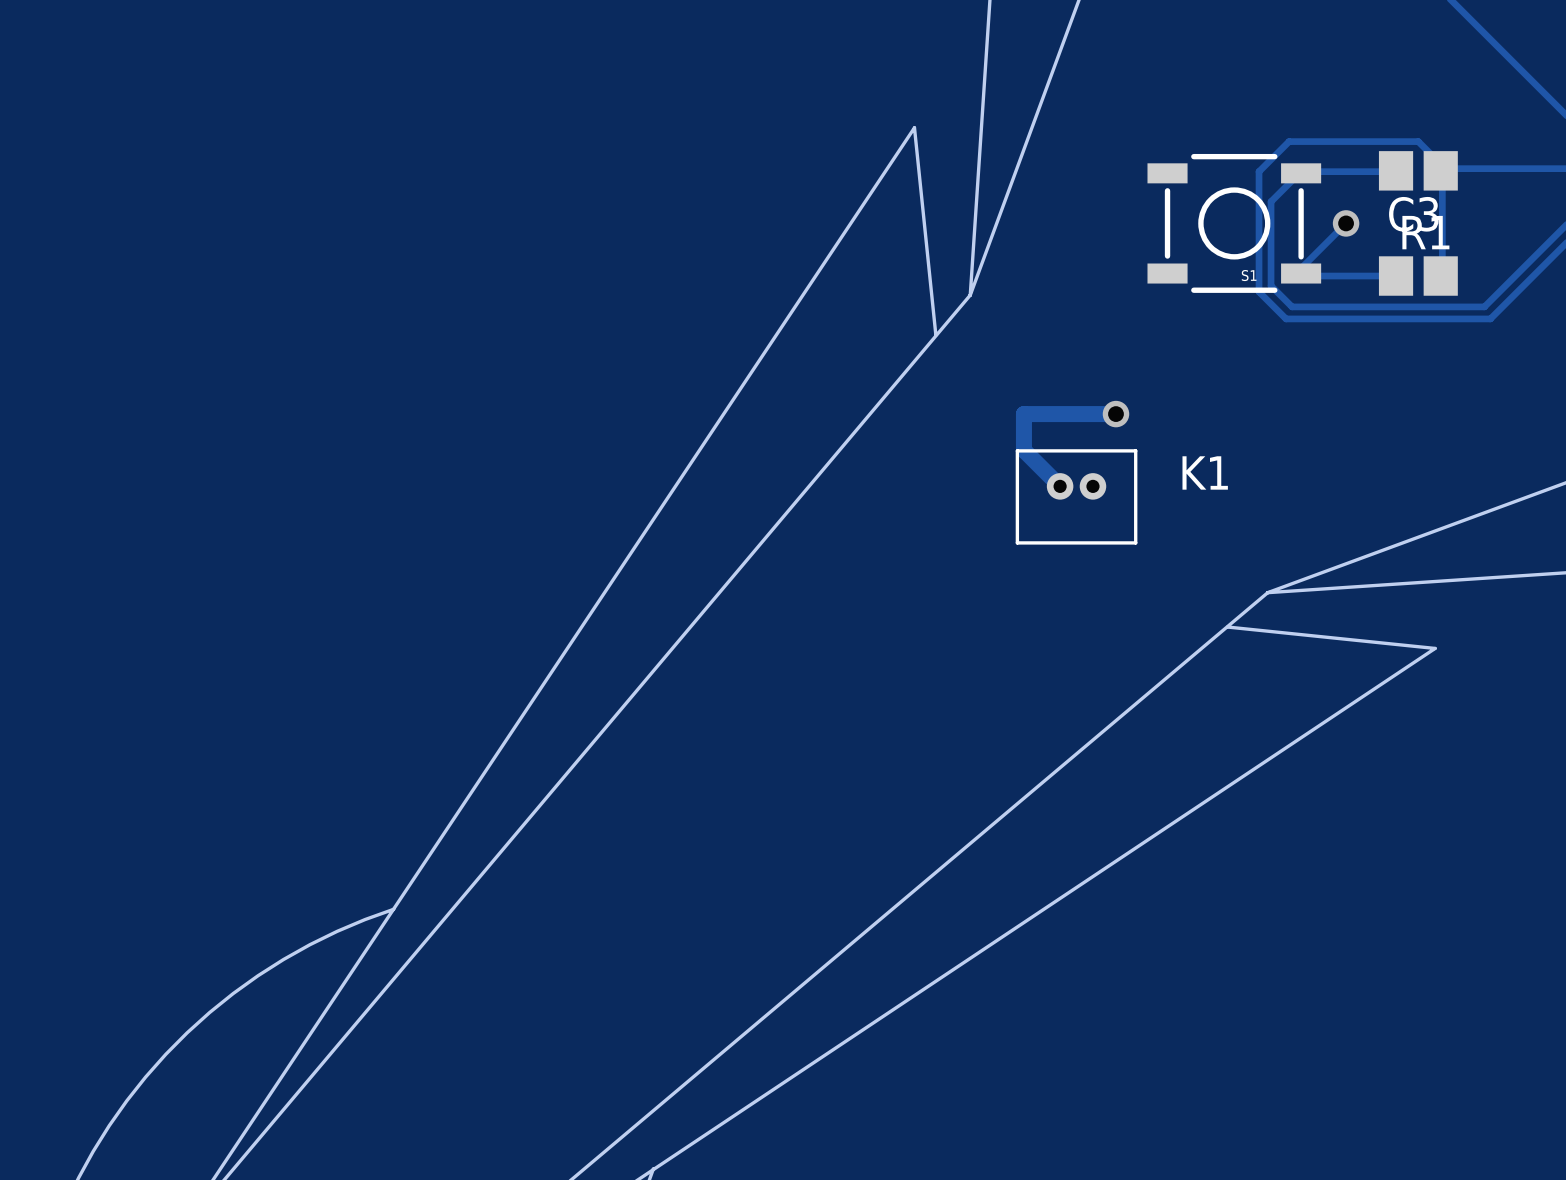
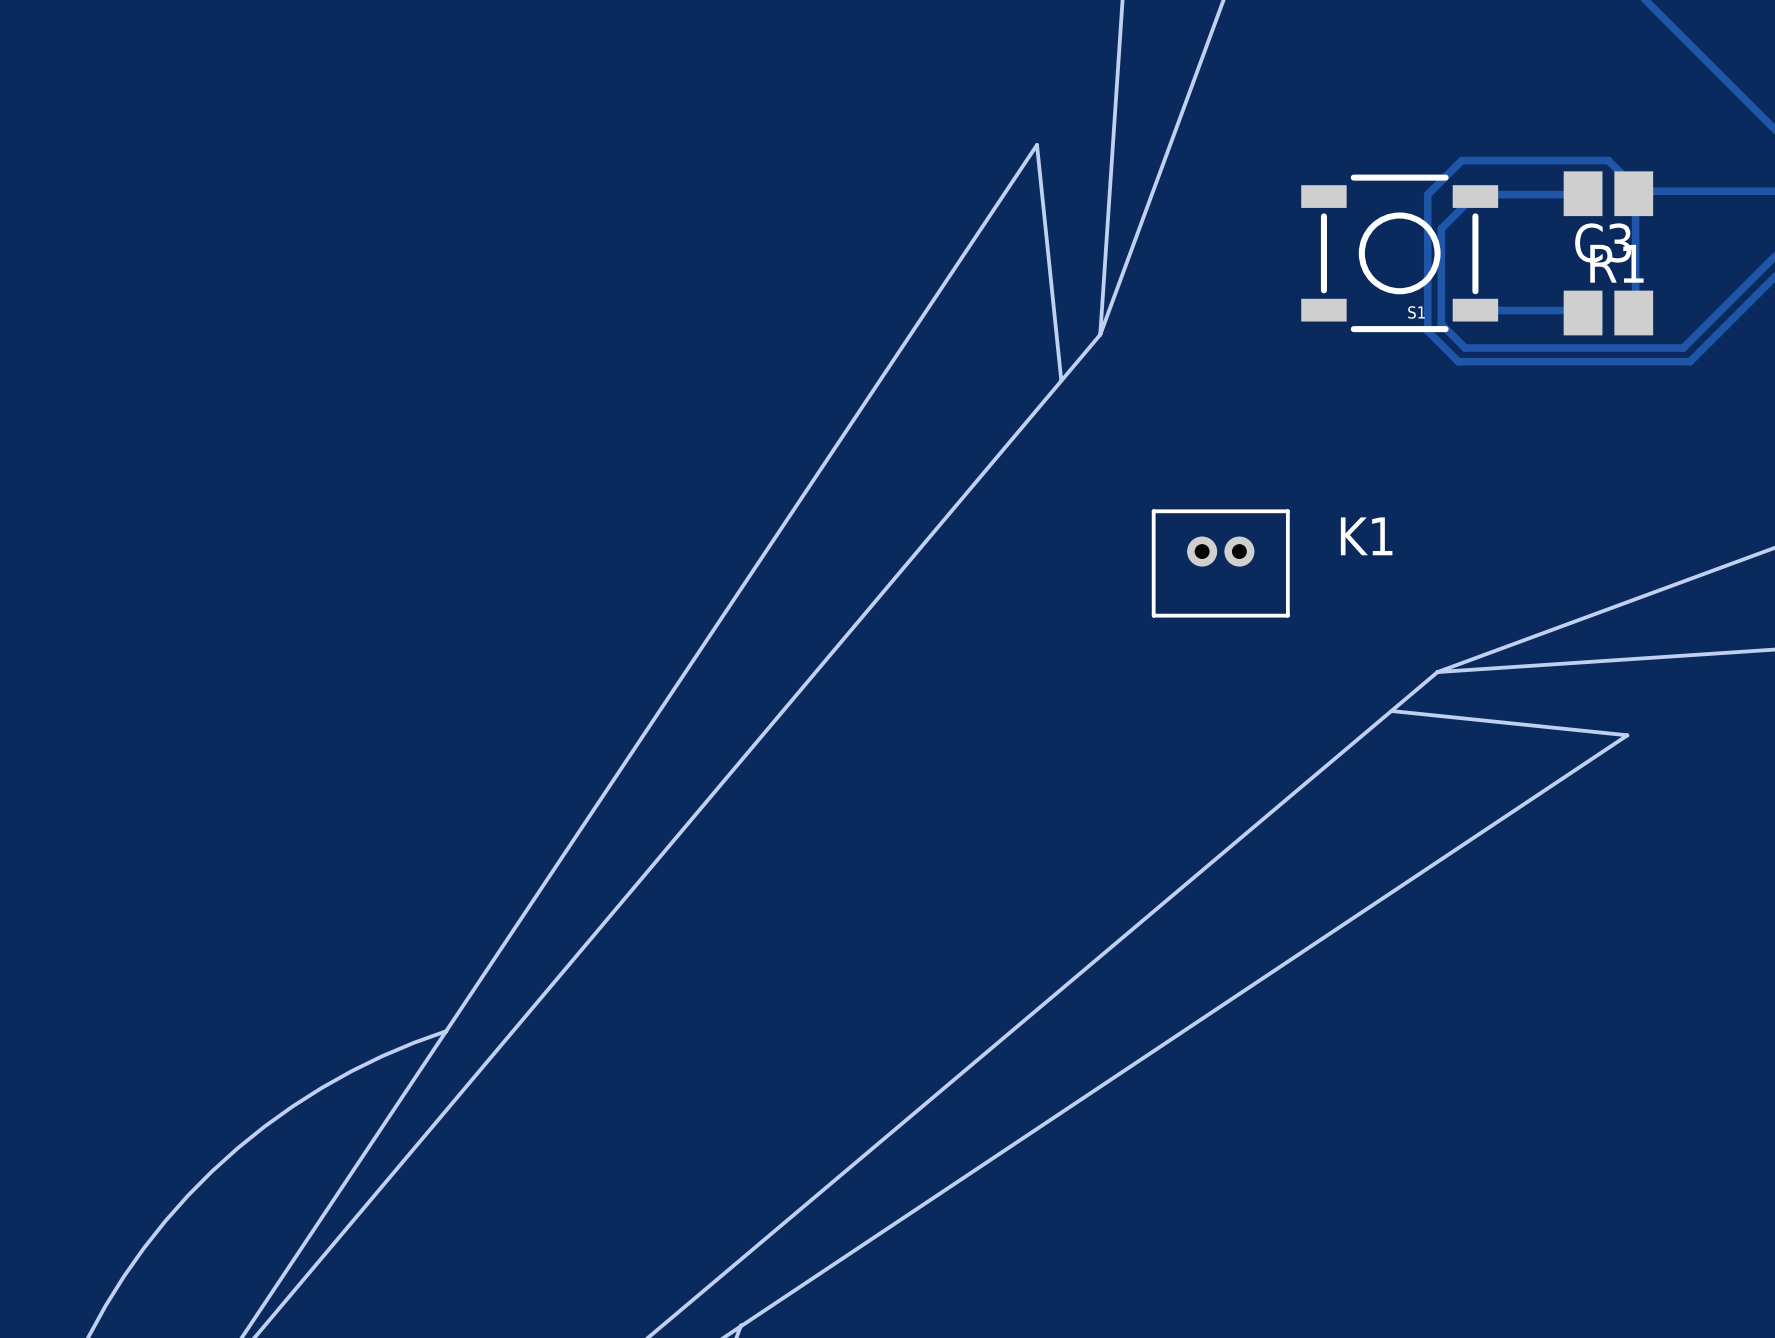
track: (1346, 223) (1300, 269) (1301, 273) (1306, 276) (1396, 276) -> (1475, 310) (1581, 310) (1583, 313)
via: (1346, 223) -> none
track: (1115, 414) (1023, 414) (1023, 450) (1060, 486) -> none
via: (1115, 414) -> none

